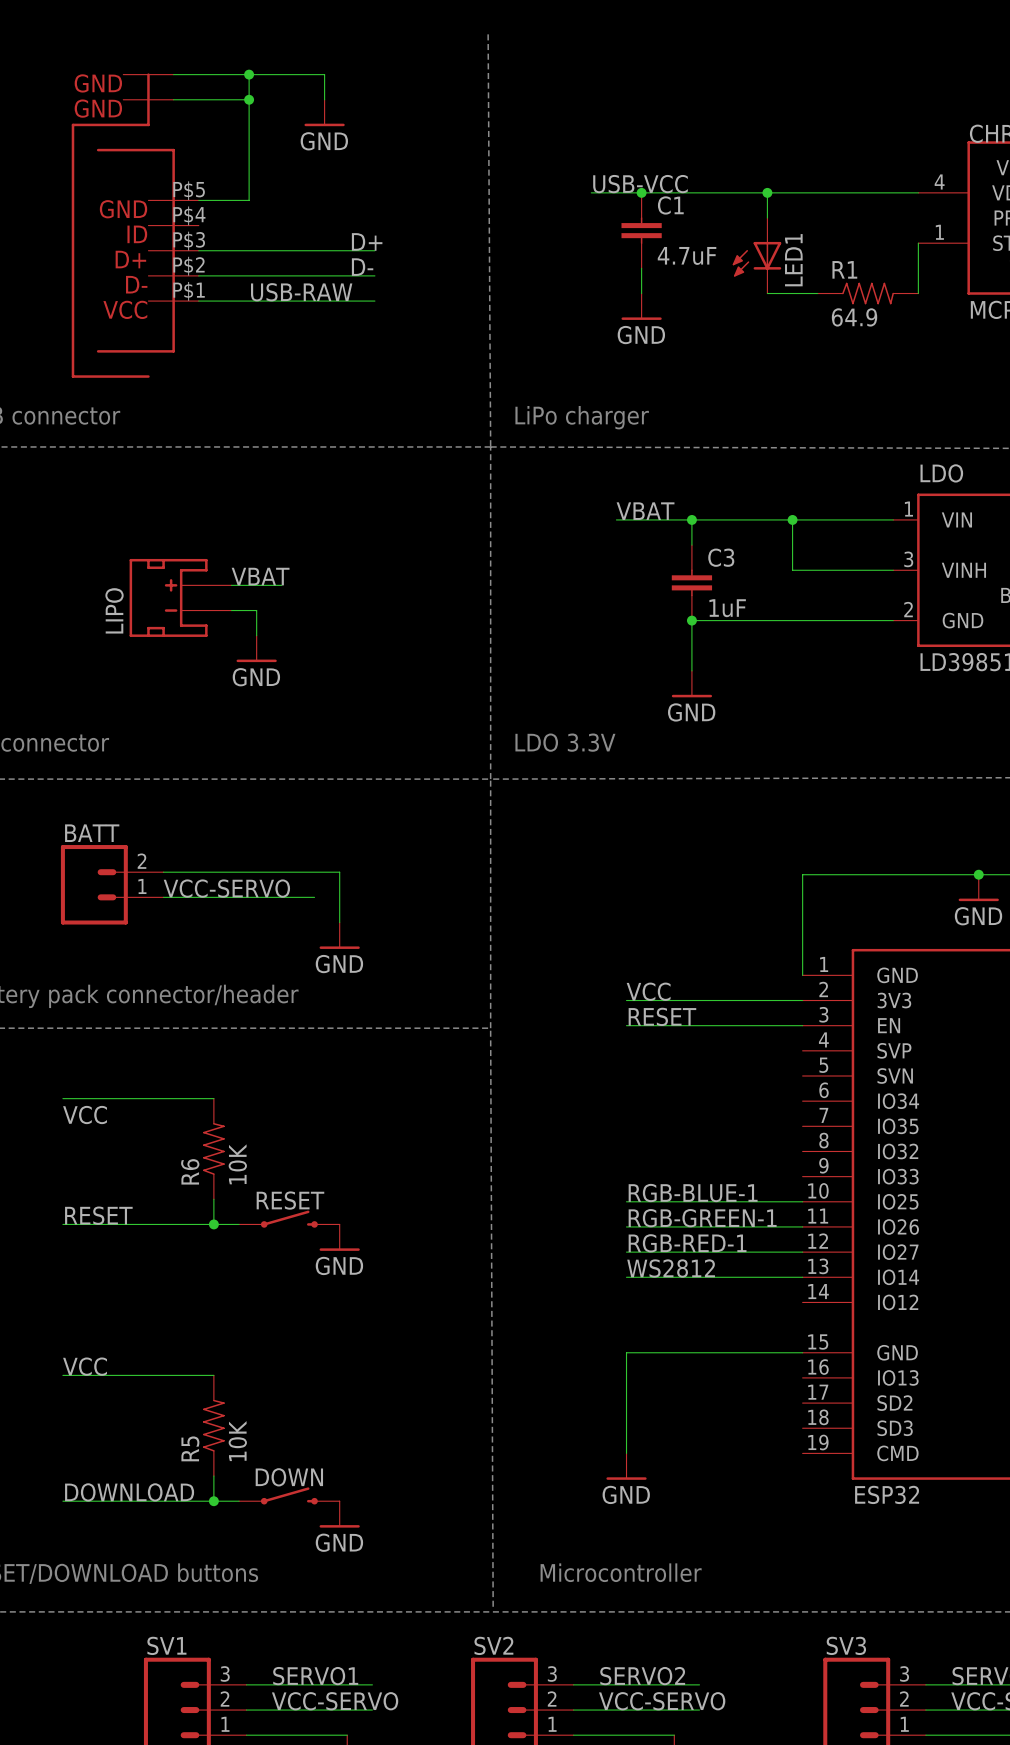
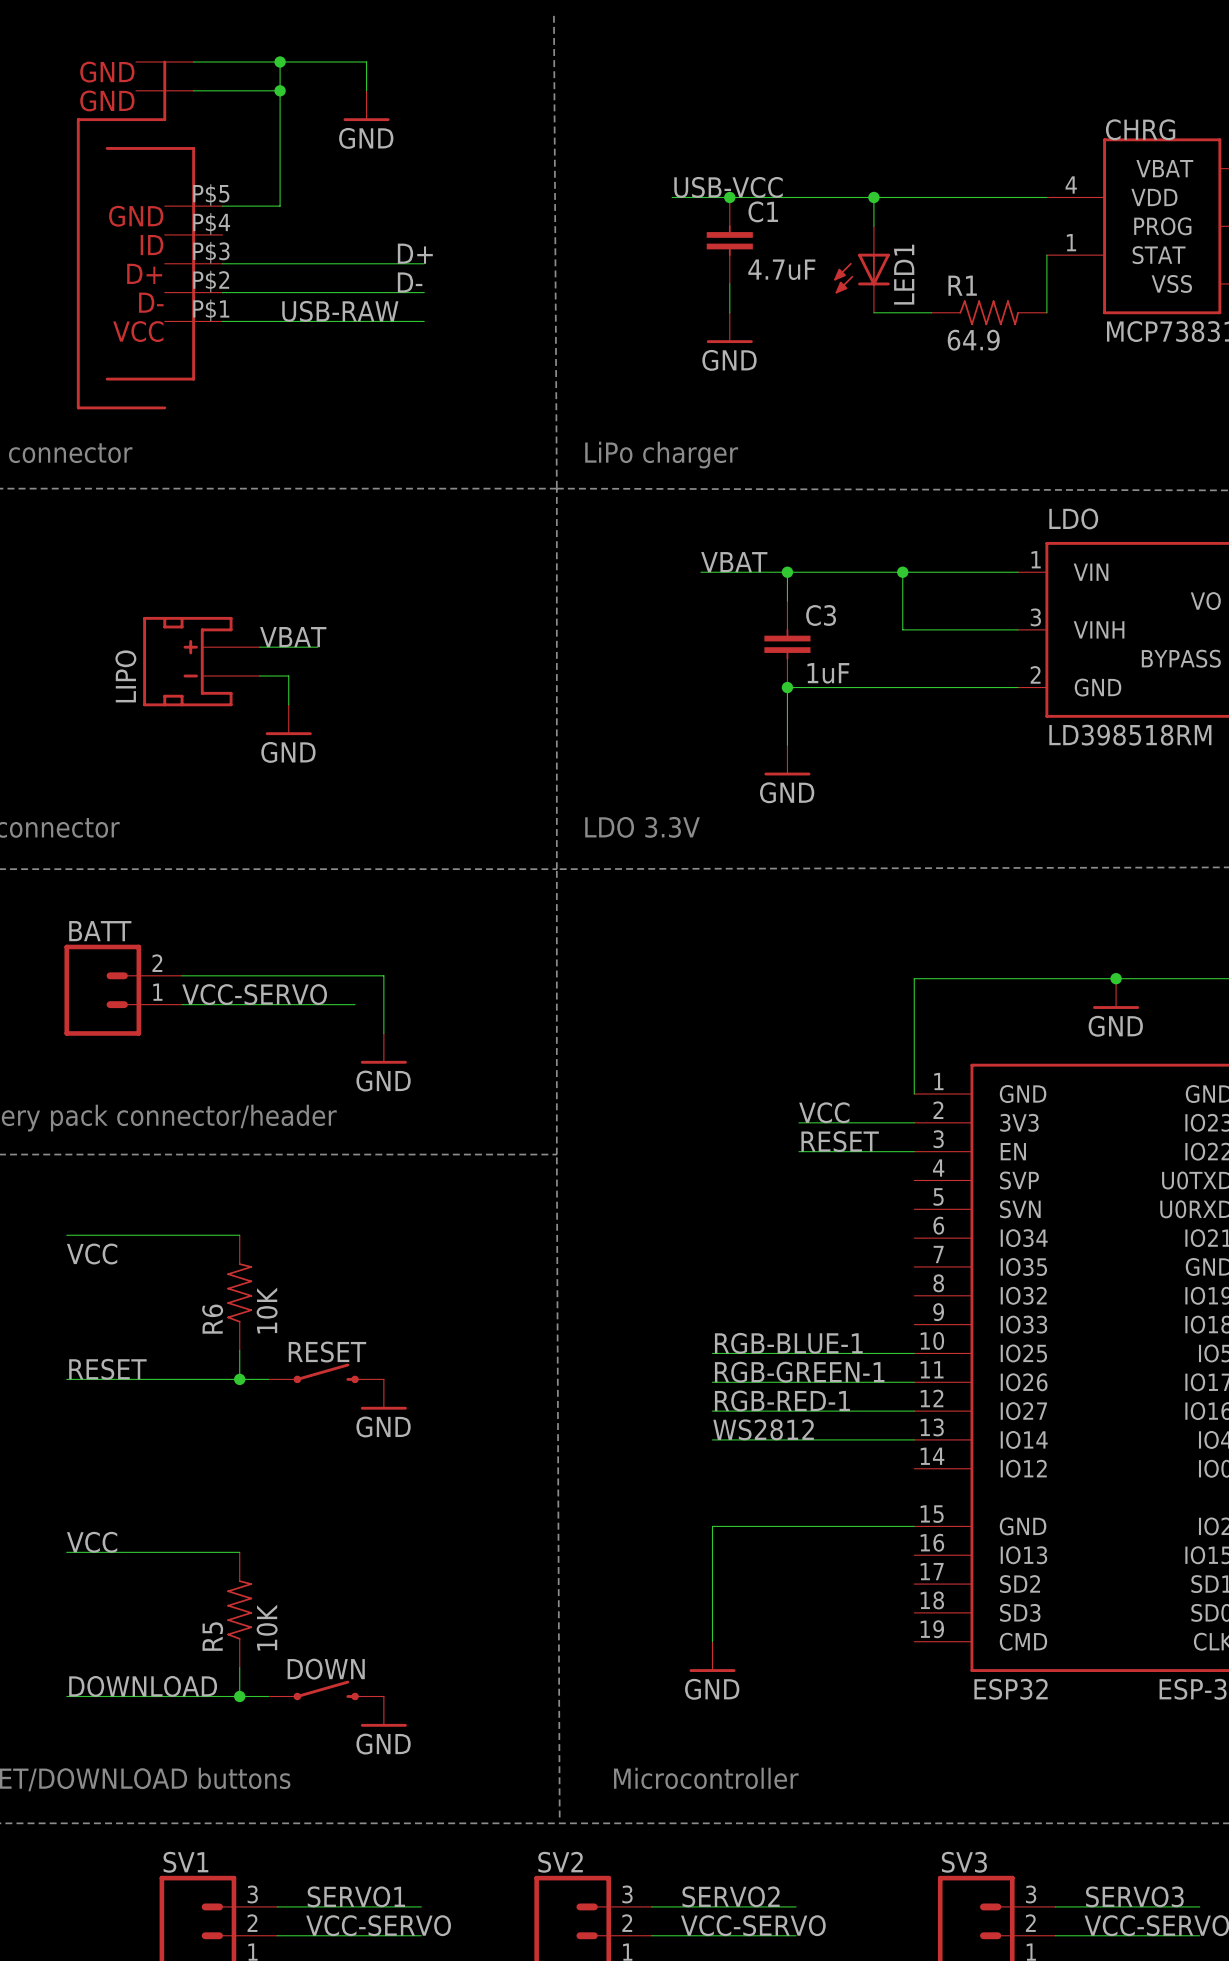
label position: VCC (648, 991) -> VCC (824, 1112)
wire: (626, 1000) (701, 1000) -> none
label position: RESET (662, 1016) -> RESET (840, 1141)
wire: (626, 1025) (701, 1025) -> none

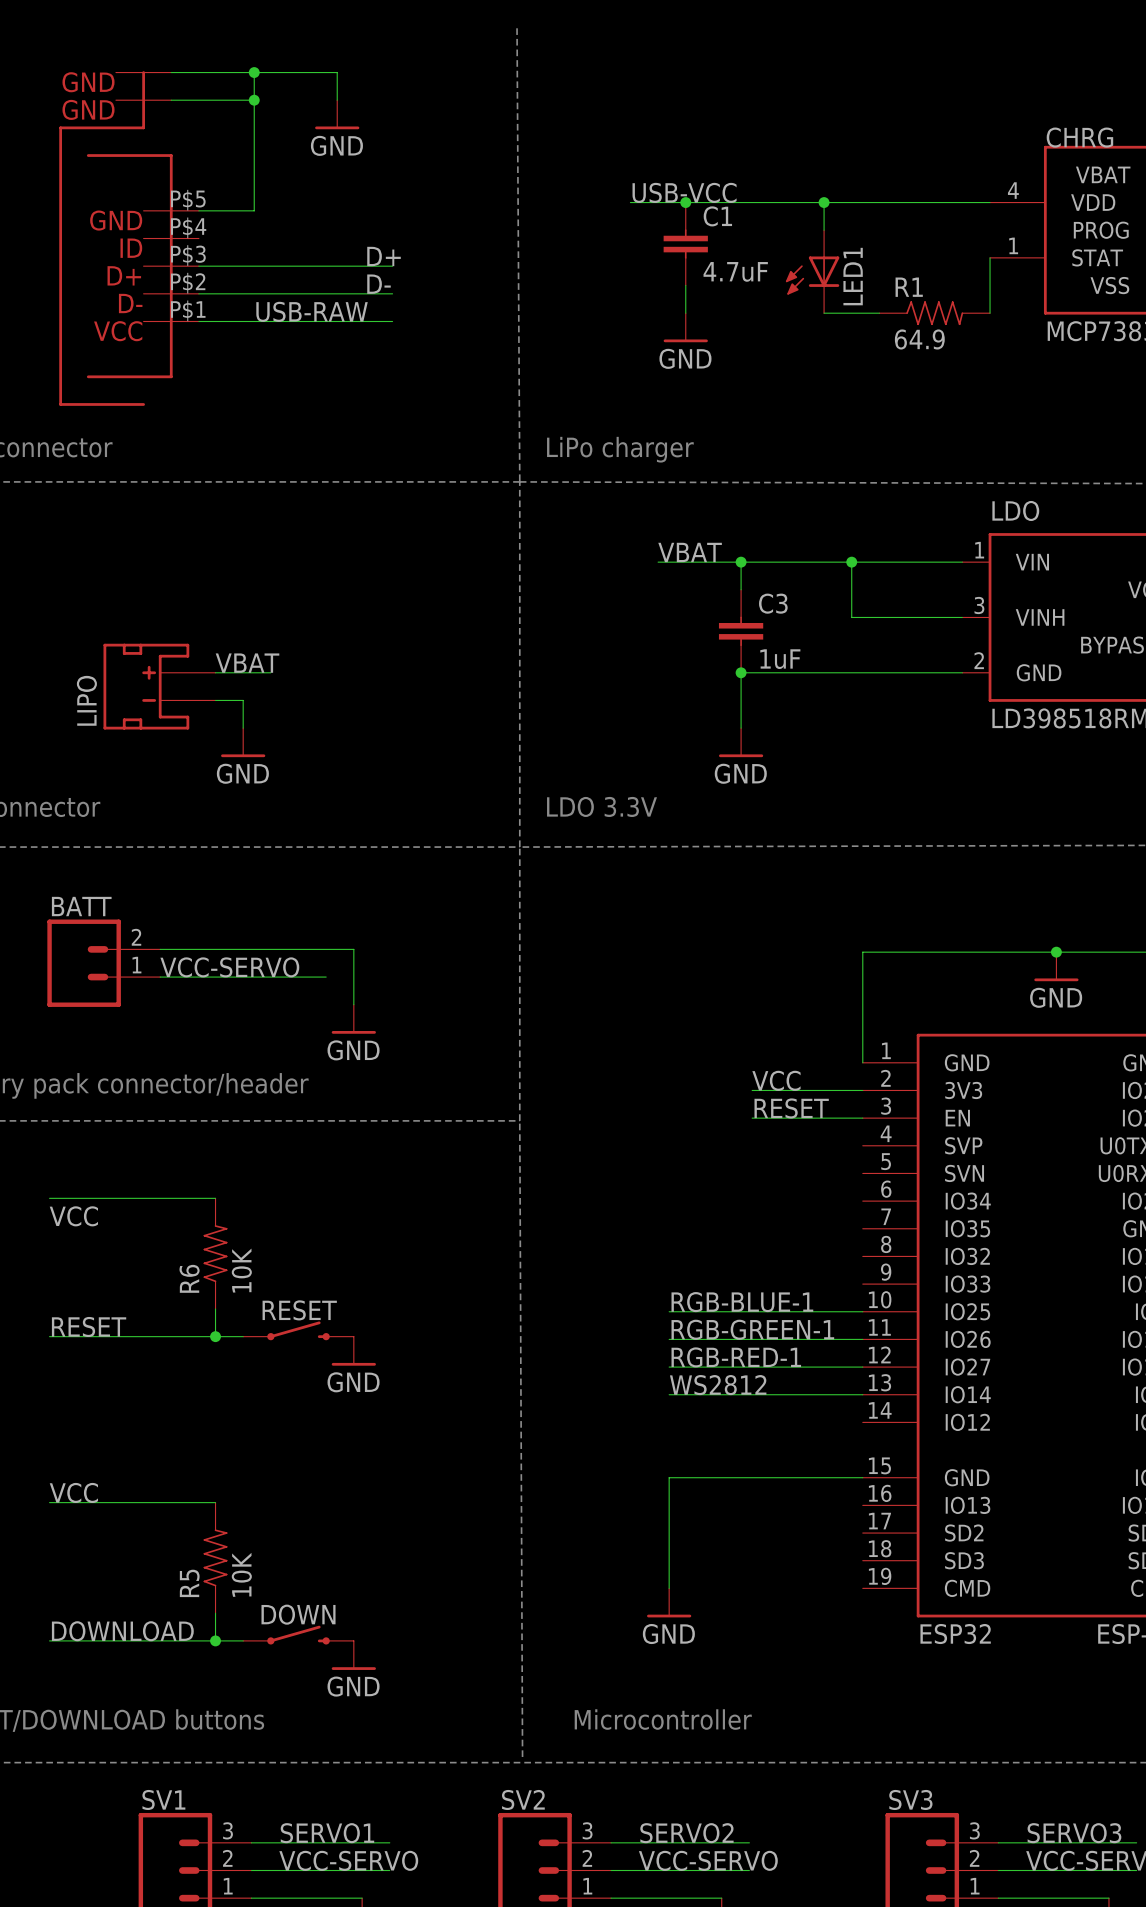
label position: VBAT (293, 637) -> VBAT (247, 663)
wire: (259, 647) (317, 647) -> (215, 672) (270, 672)
LIPO position: (201, 661) -> (159, 686)
wire: (259, 676) (288, 676) (288, 704) -> (215, 700) (243, 700) (243, 728)
power symbol position: GND (288, 719) -> GND (243, 742)

